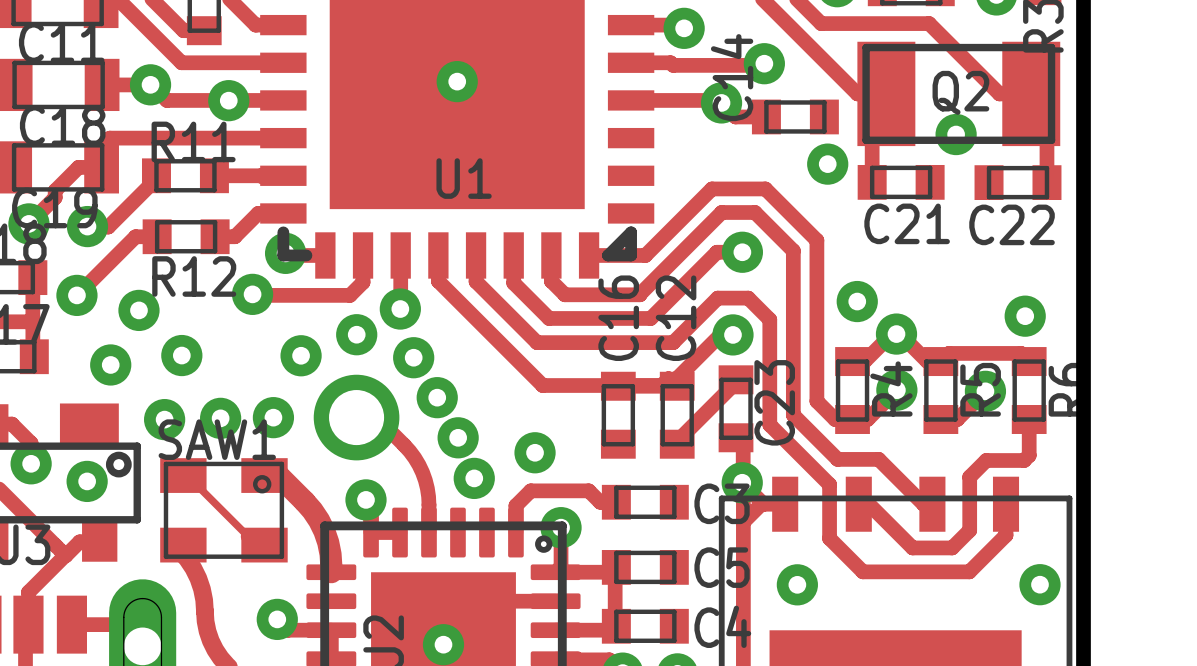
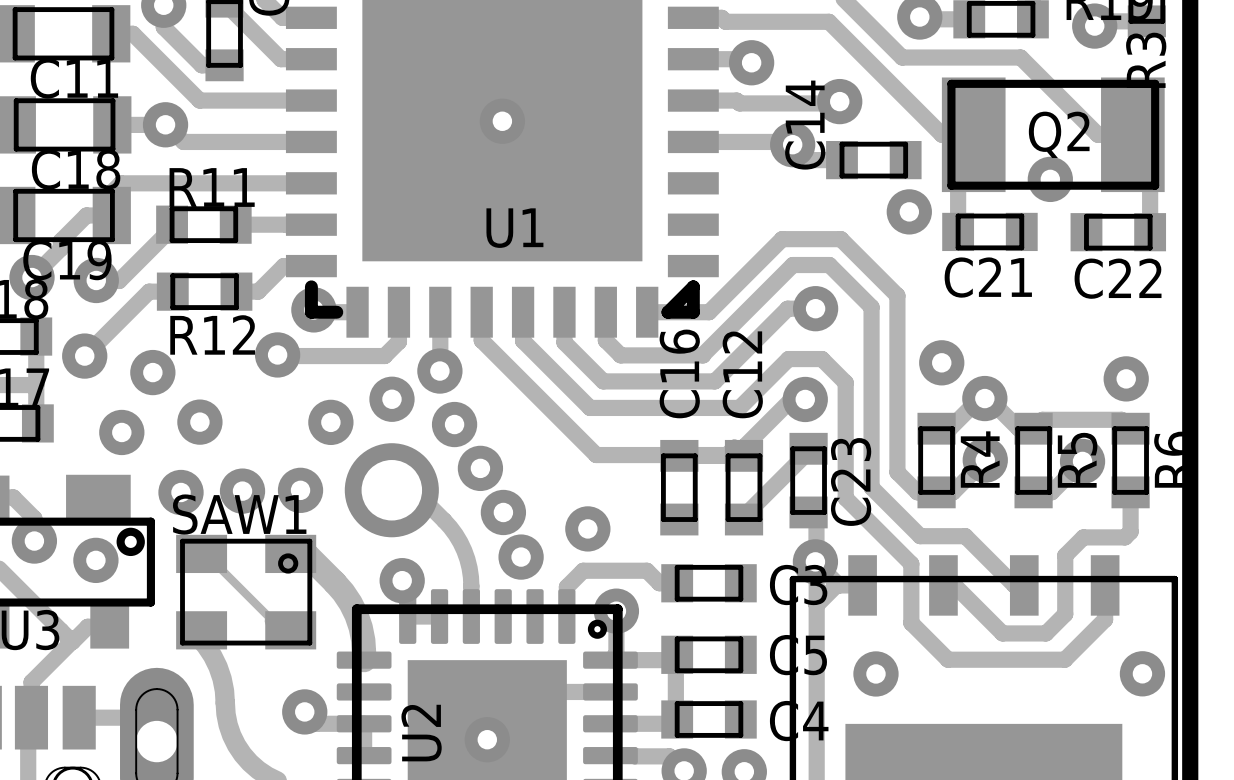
via: (228, 100) -> none

